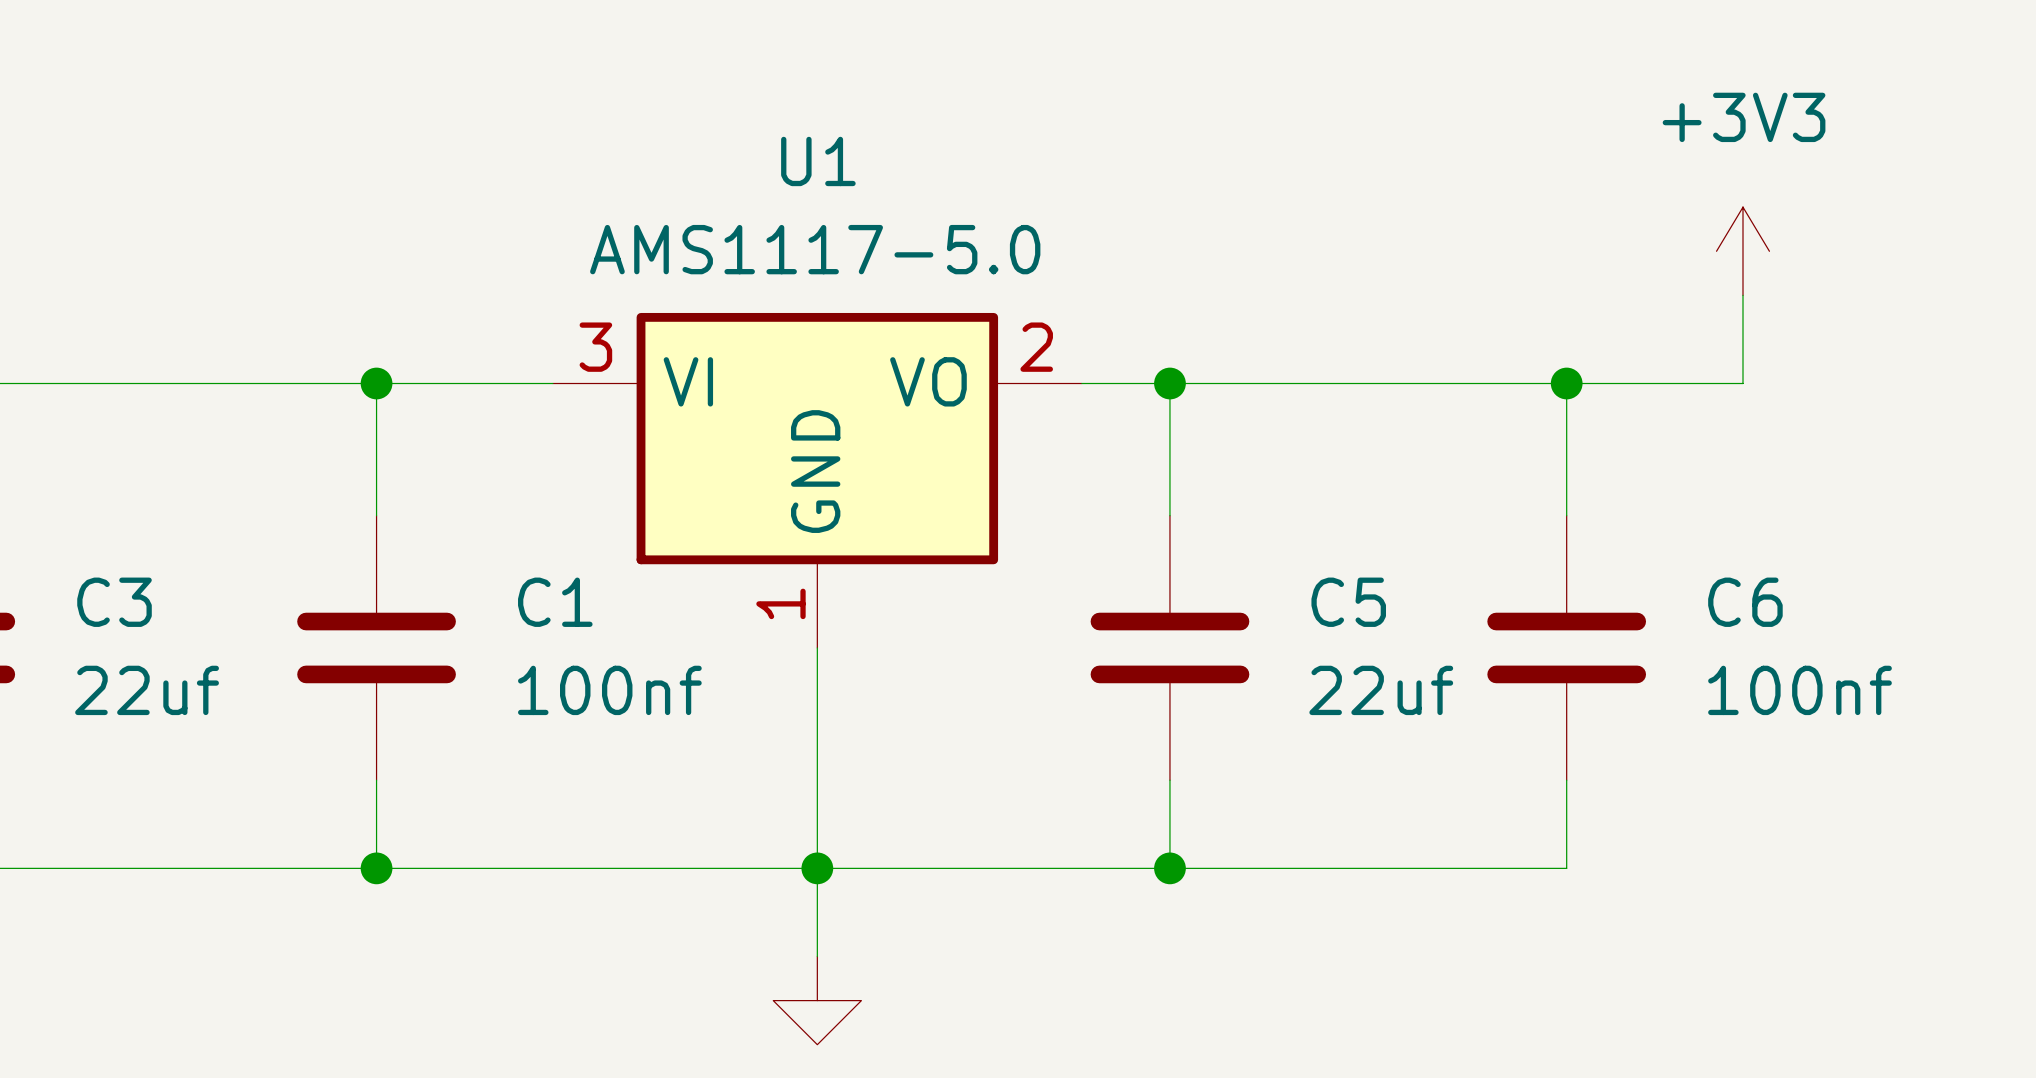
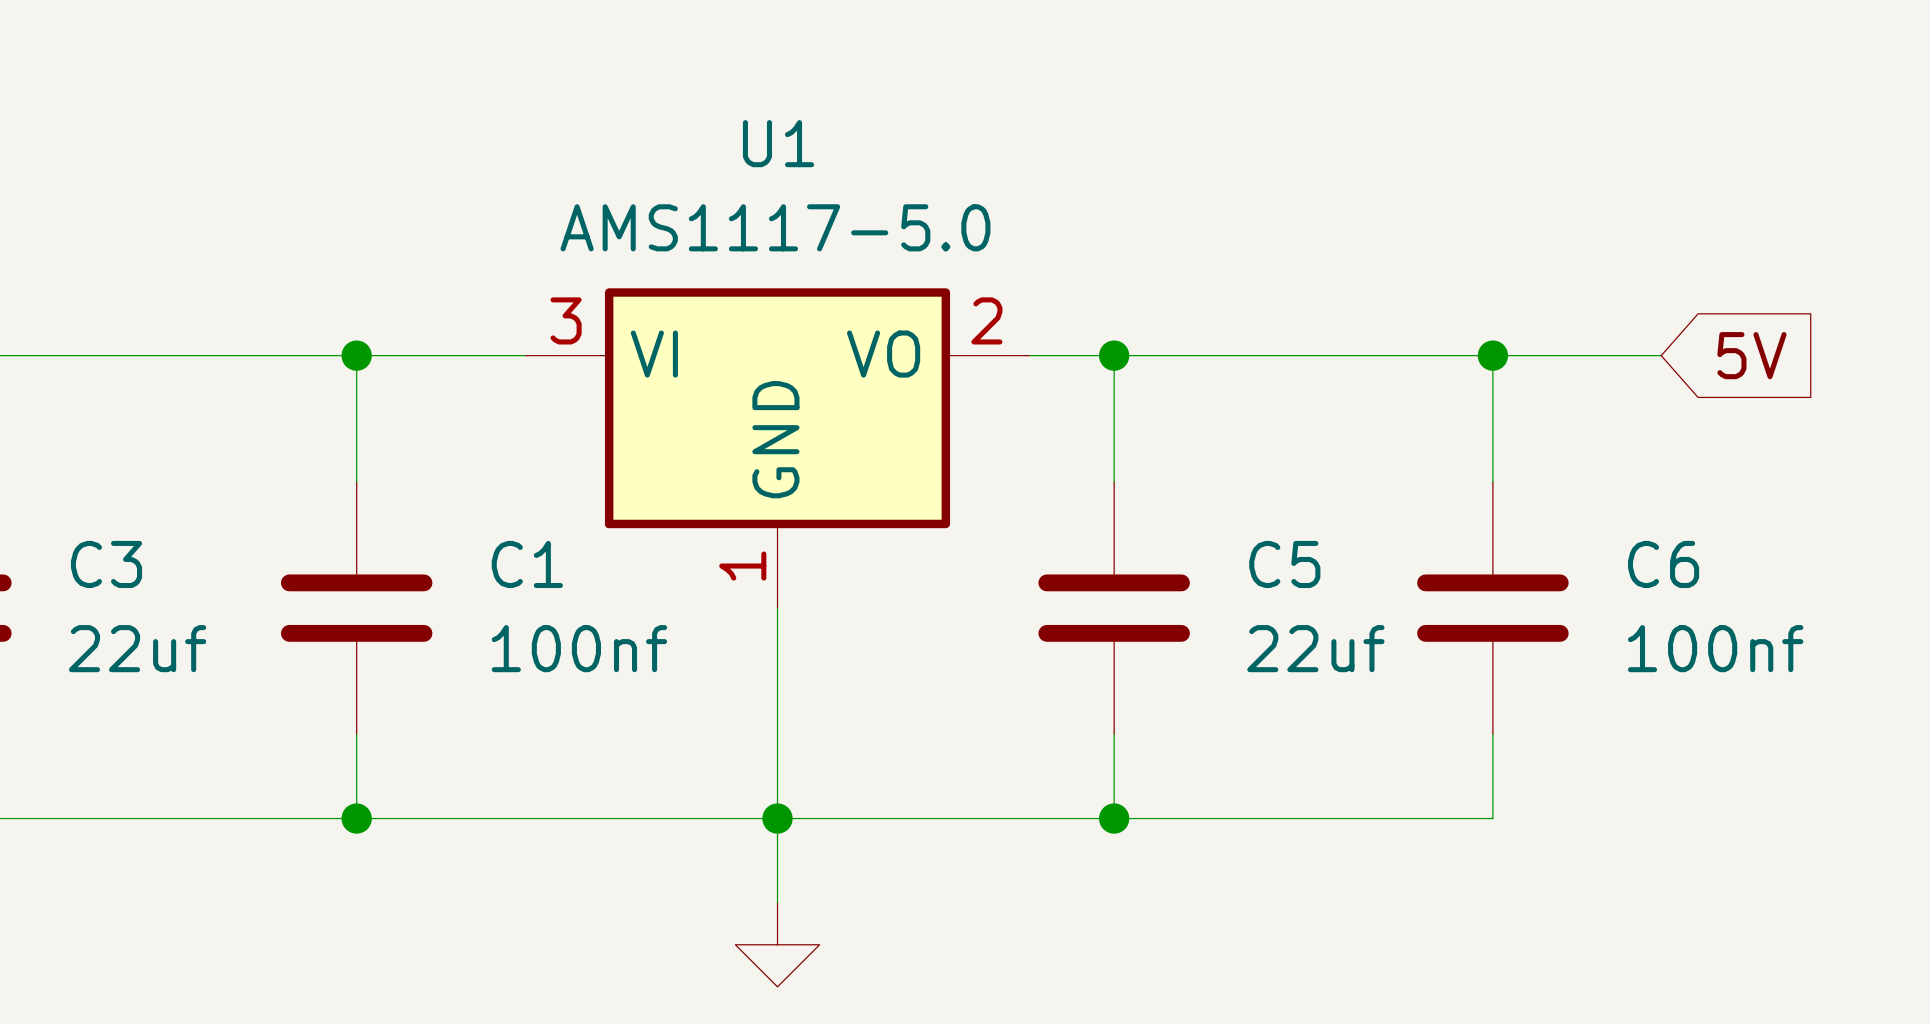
power symbol: +3V3 (1742, 251) -> none
wire: (1742, 295) (1742, 383) -> none
global label: none -> 5V (1751, 355)

